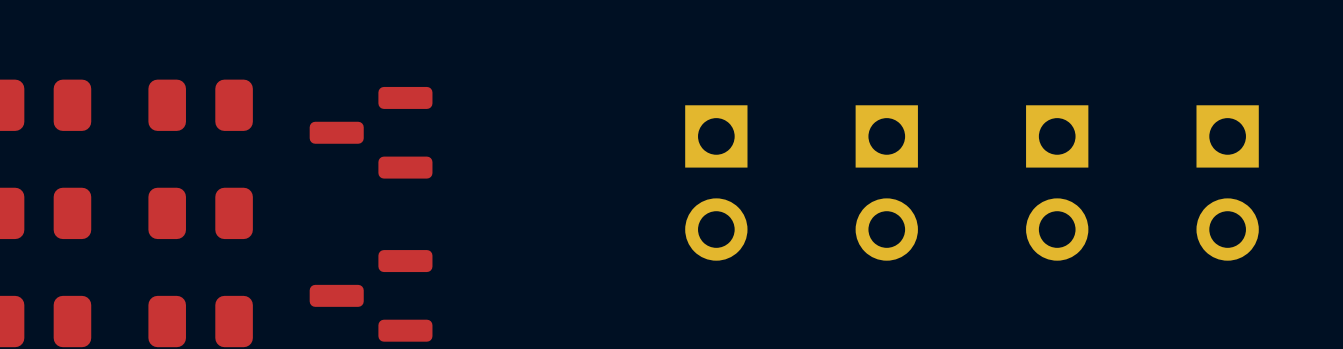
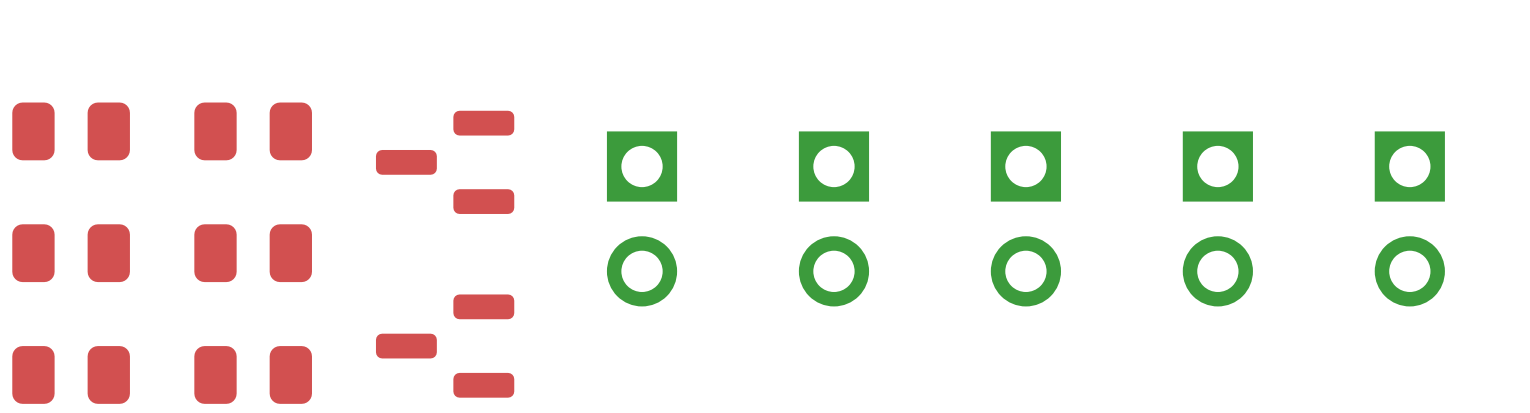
part: none -> (642, 218)

